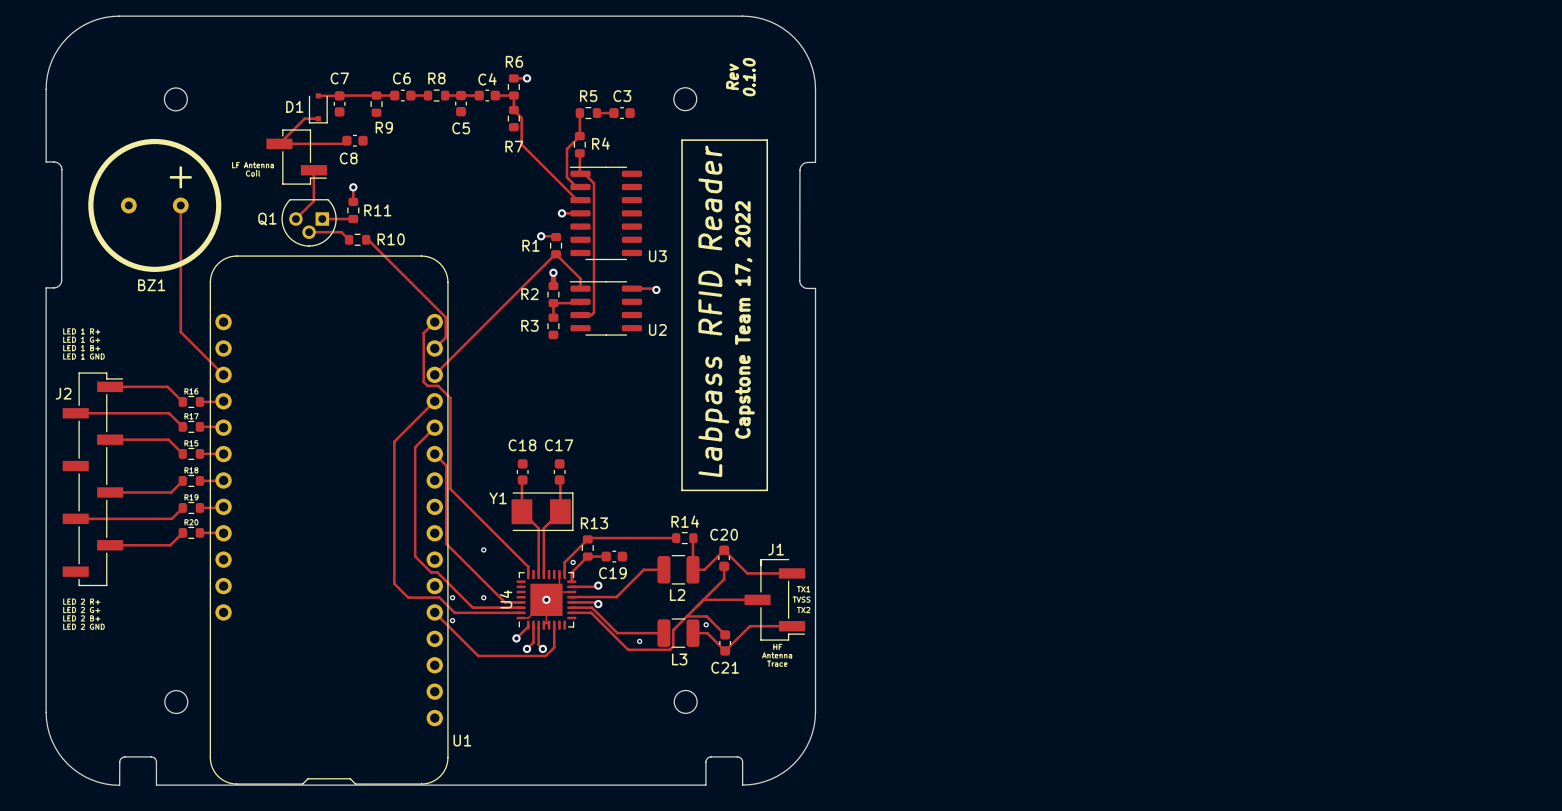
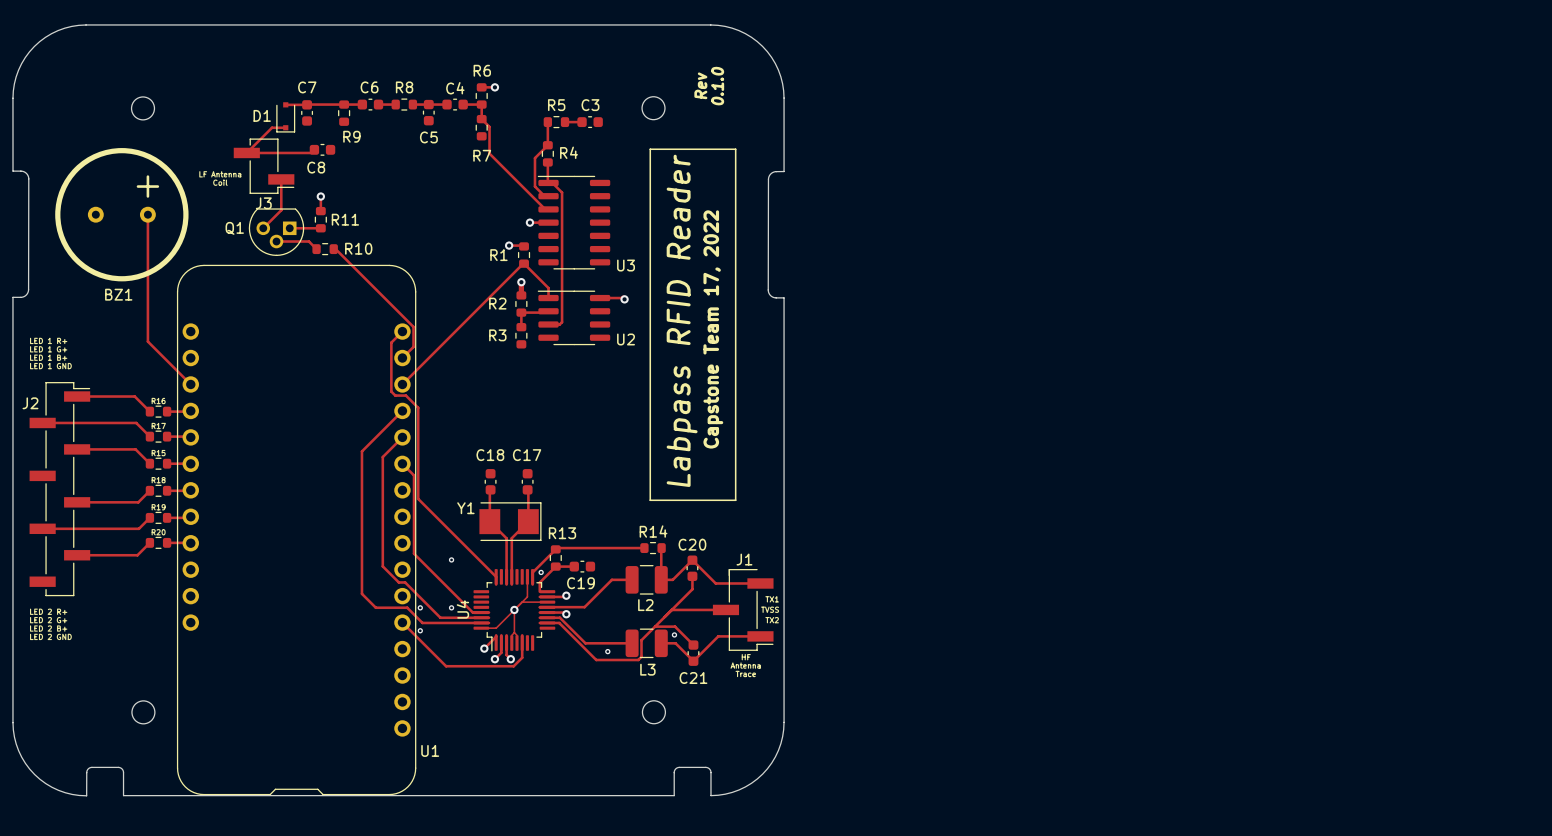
J3 name: none -> J3 (263, 203)
U4 footprint: [516, 569, 577, 630] -> [473, 569, 556, 652]

